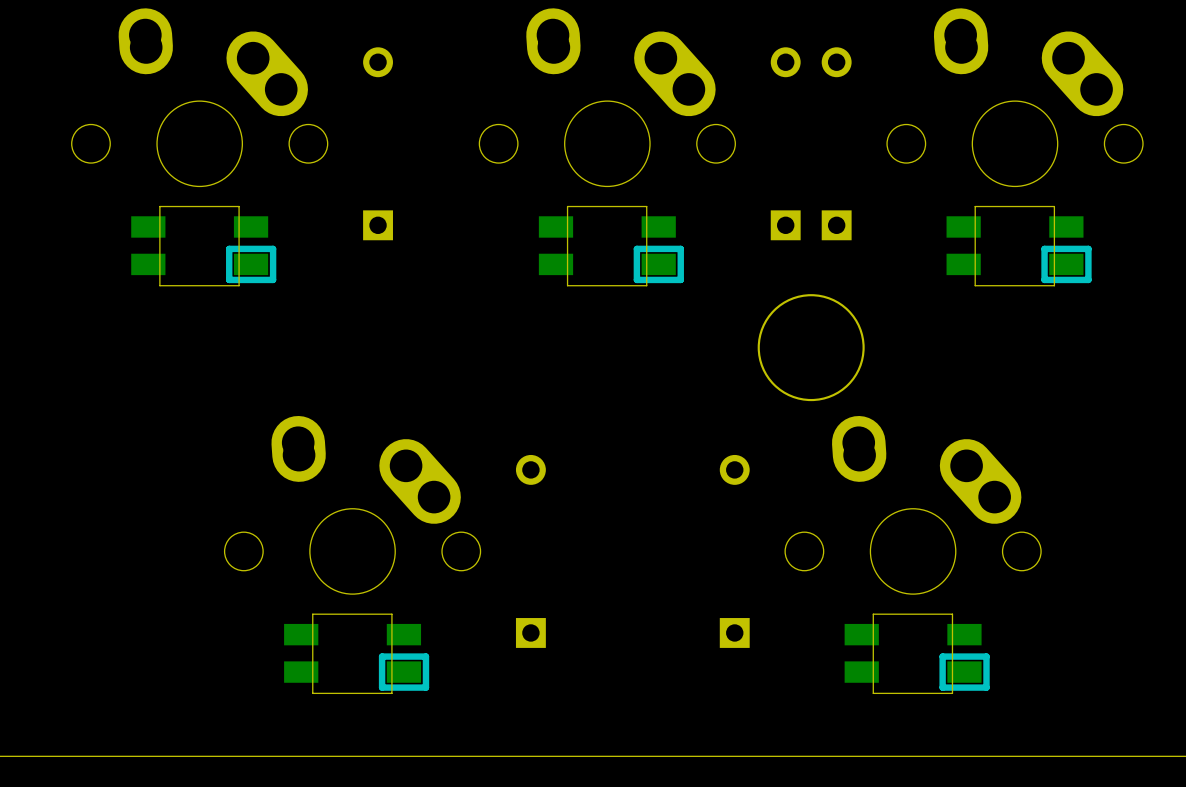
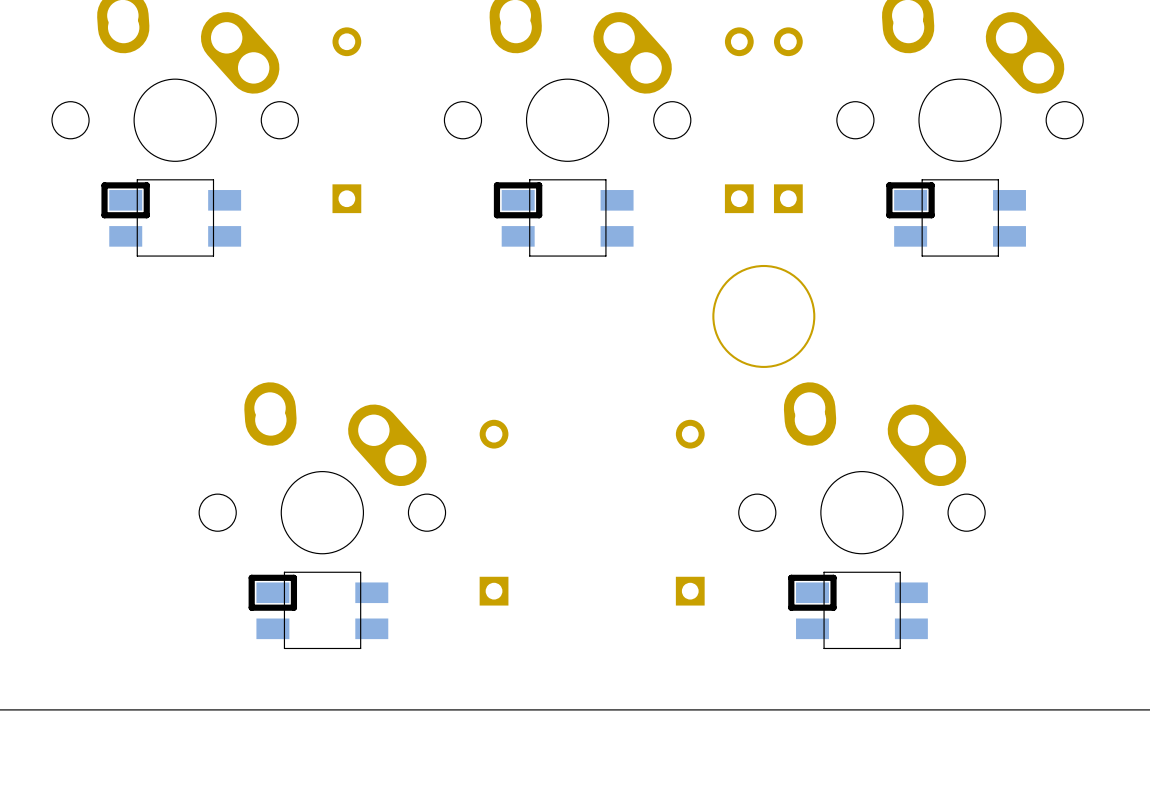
part rotation: 0° (203, 246) -> 180° (171, 217)
part rotation: 0° (611, 246) -> 180° (563, 217)
part rotation: 0° (1019, 246) -> 180° (956, 217)
part rotation: 0° (356, 653) -> 180° (318, 610)
part rotation: 0° (917, 653) -> 180° (858, 610)

